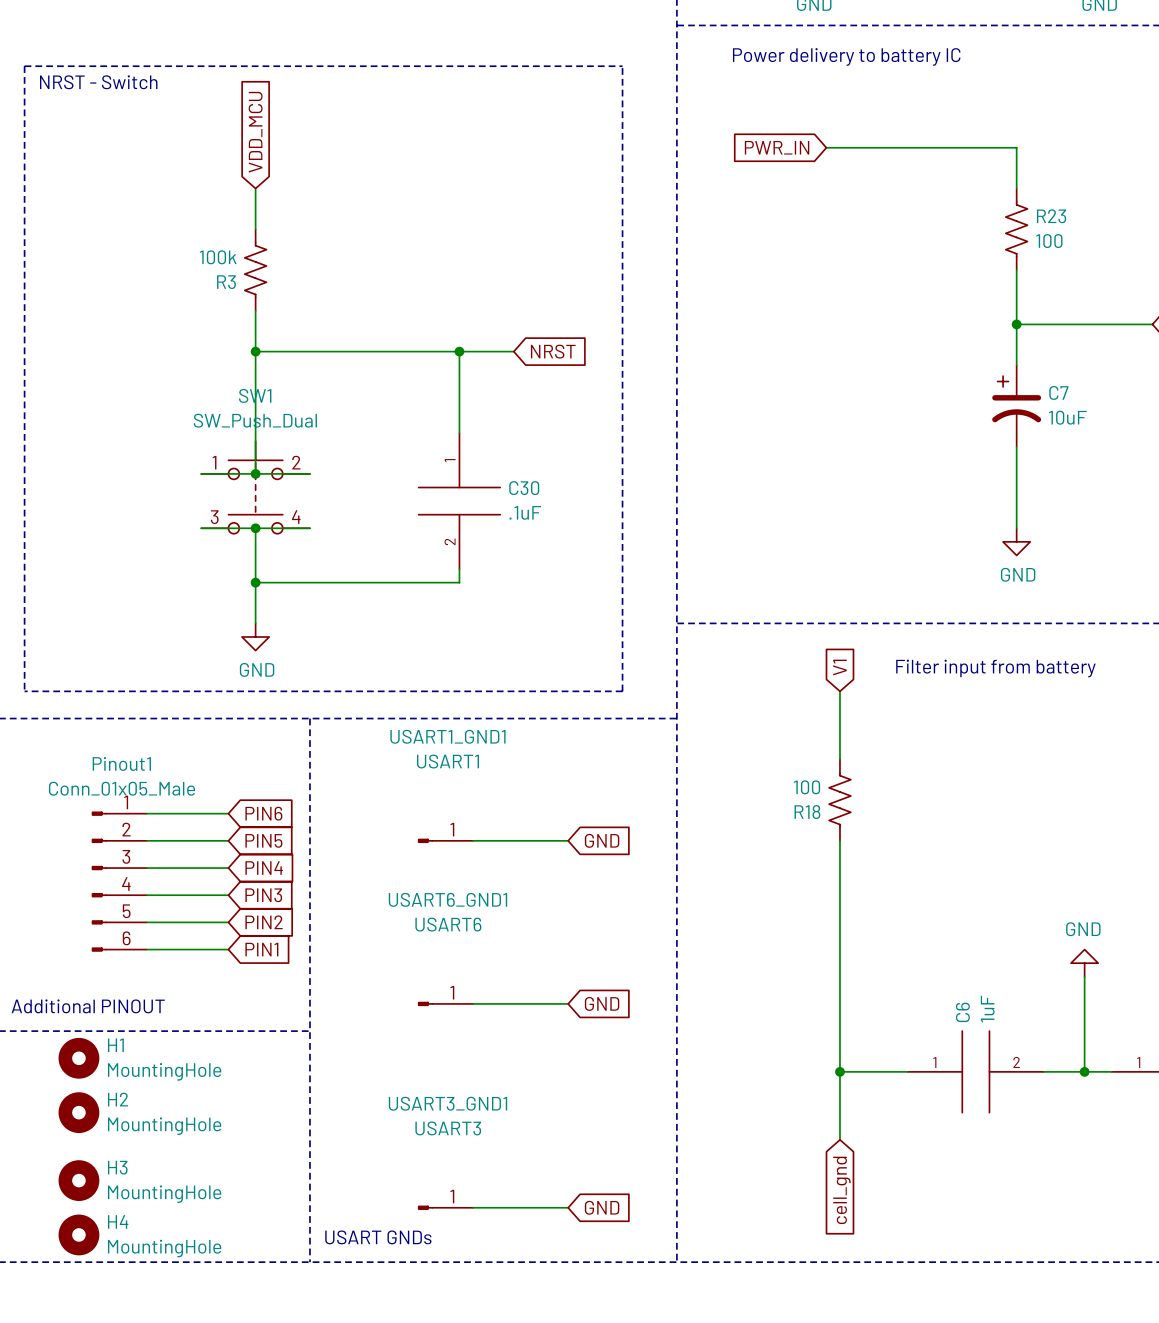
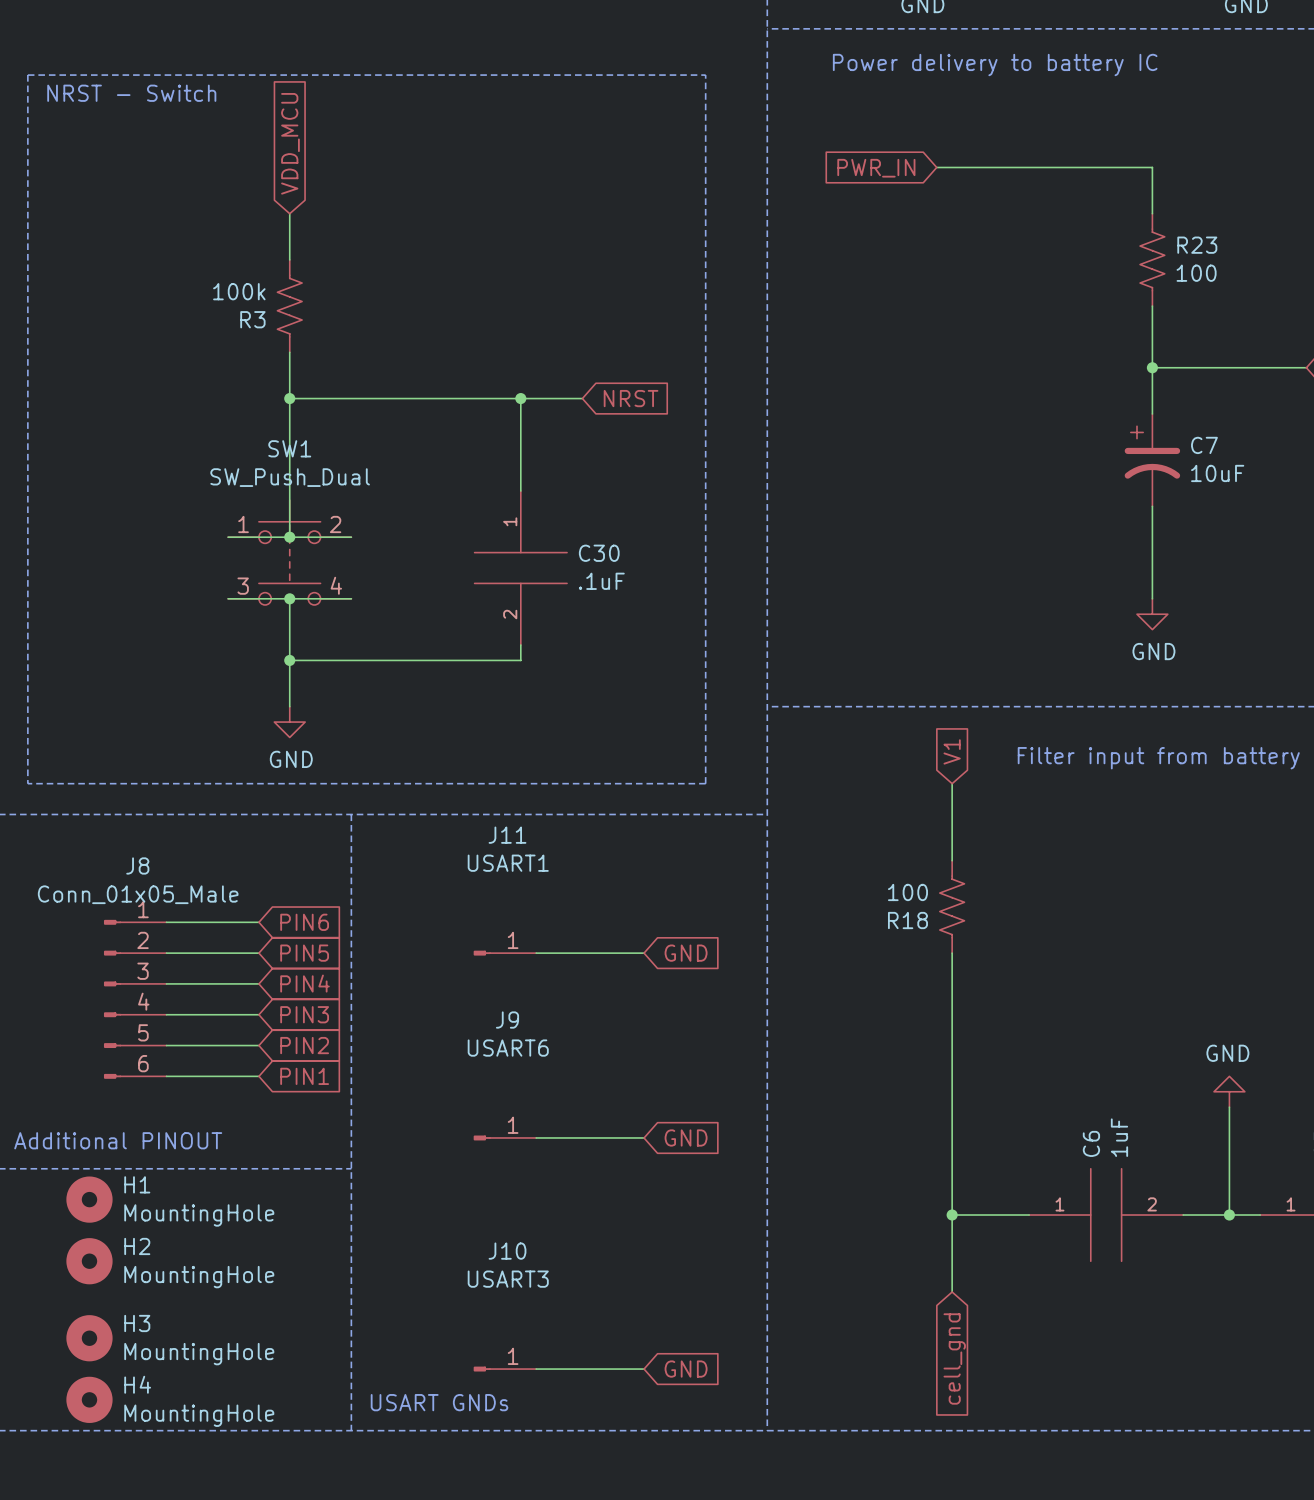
USART1_GND1 name: USART1_GND1 (447, 736) -> J11 (507, 835)
Pinout1 name: Pinout1 (121, 763) -> J8 (137, 865)
USART6_GND1 name: USART6_GND1 (447, 899) -> J9 (507, 1020)
USART3_GND1 name: USART3_GND1 (447, 1103) -> J10 (507, 1251)

